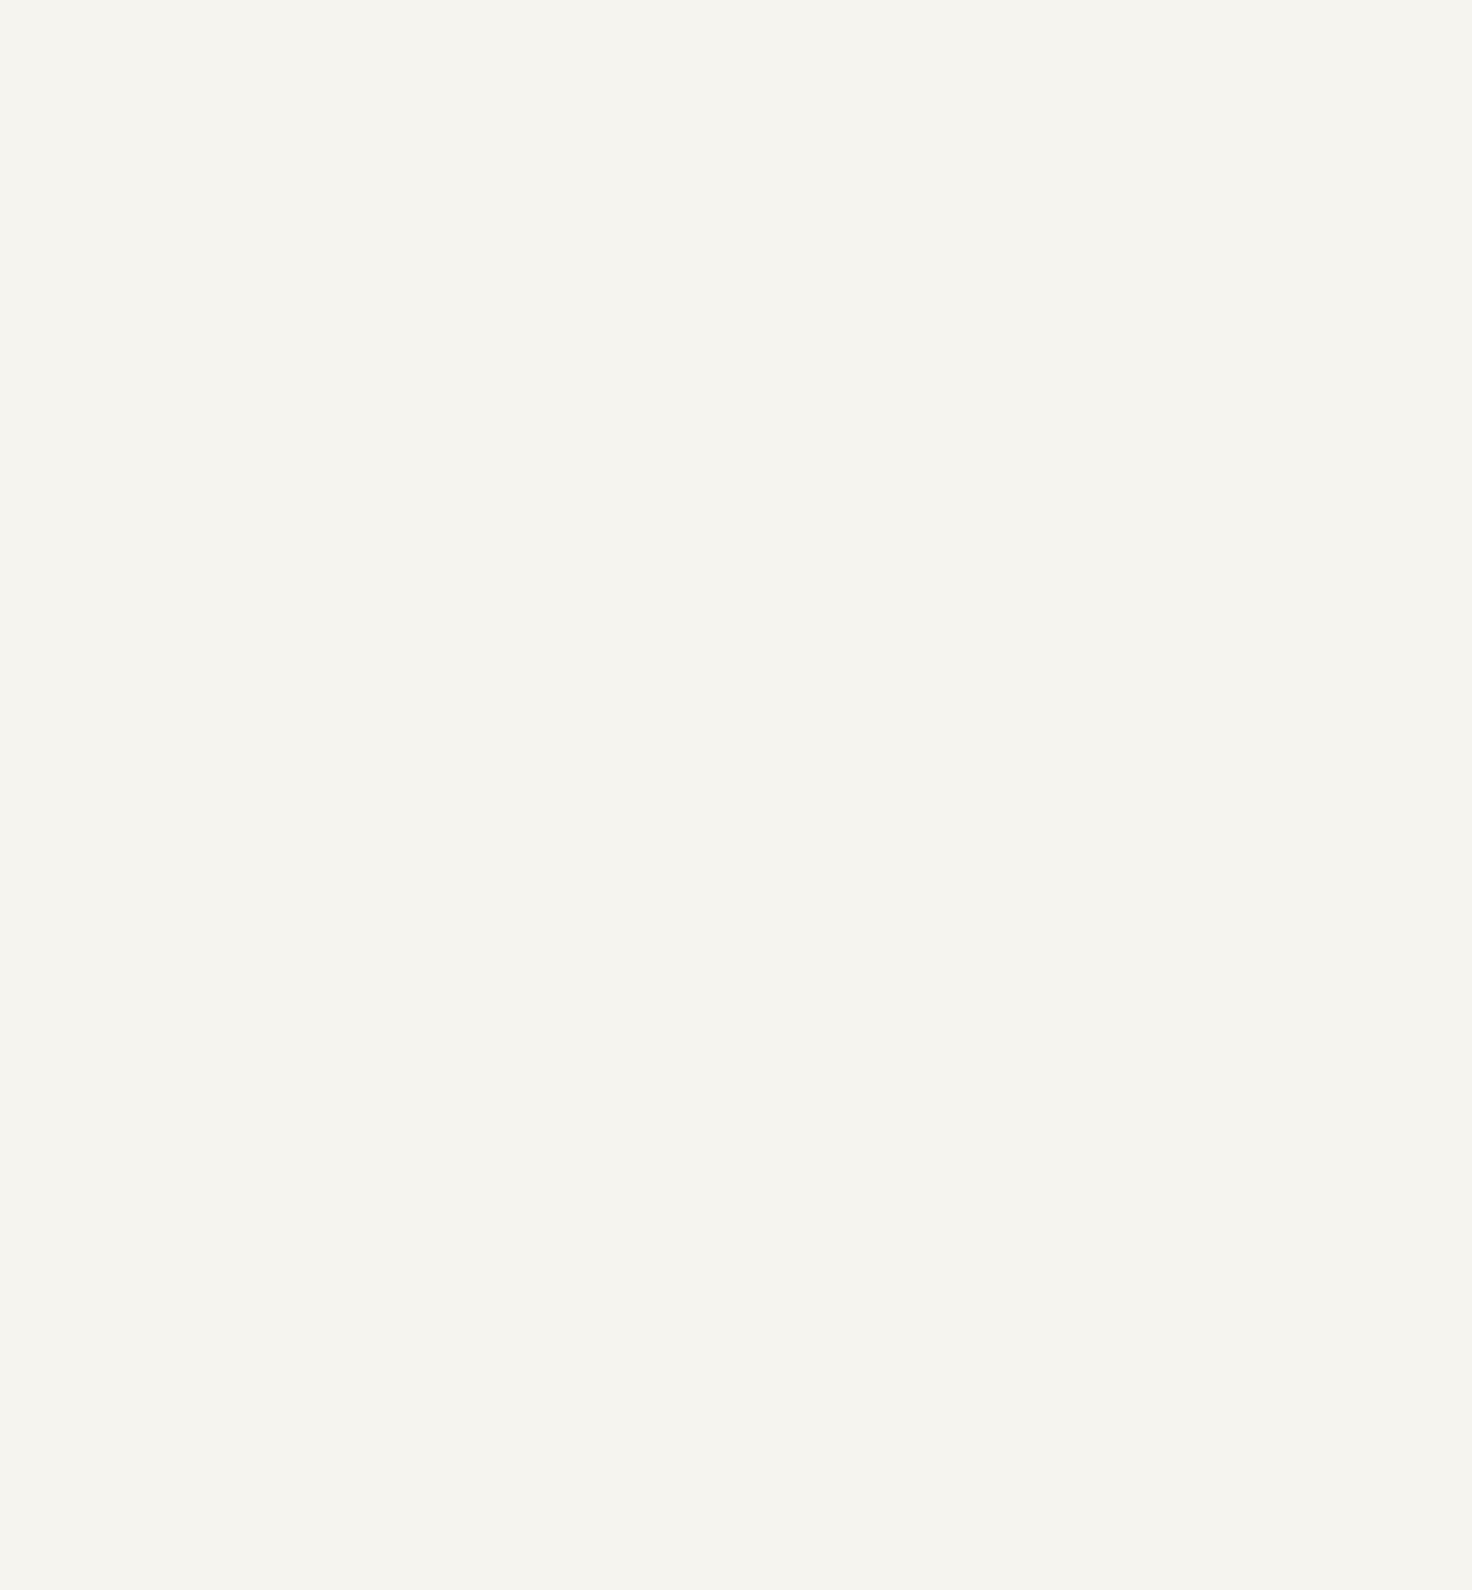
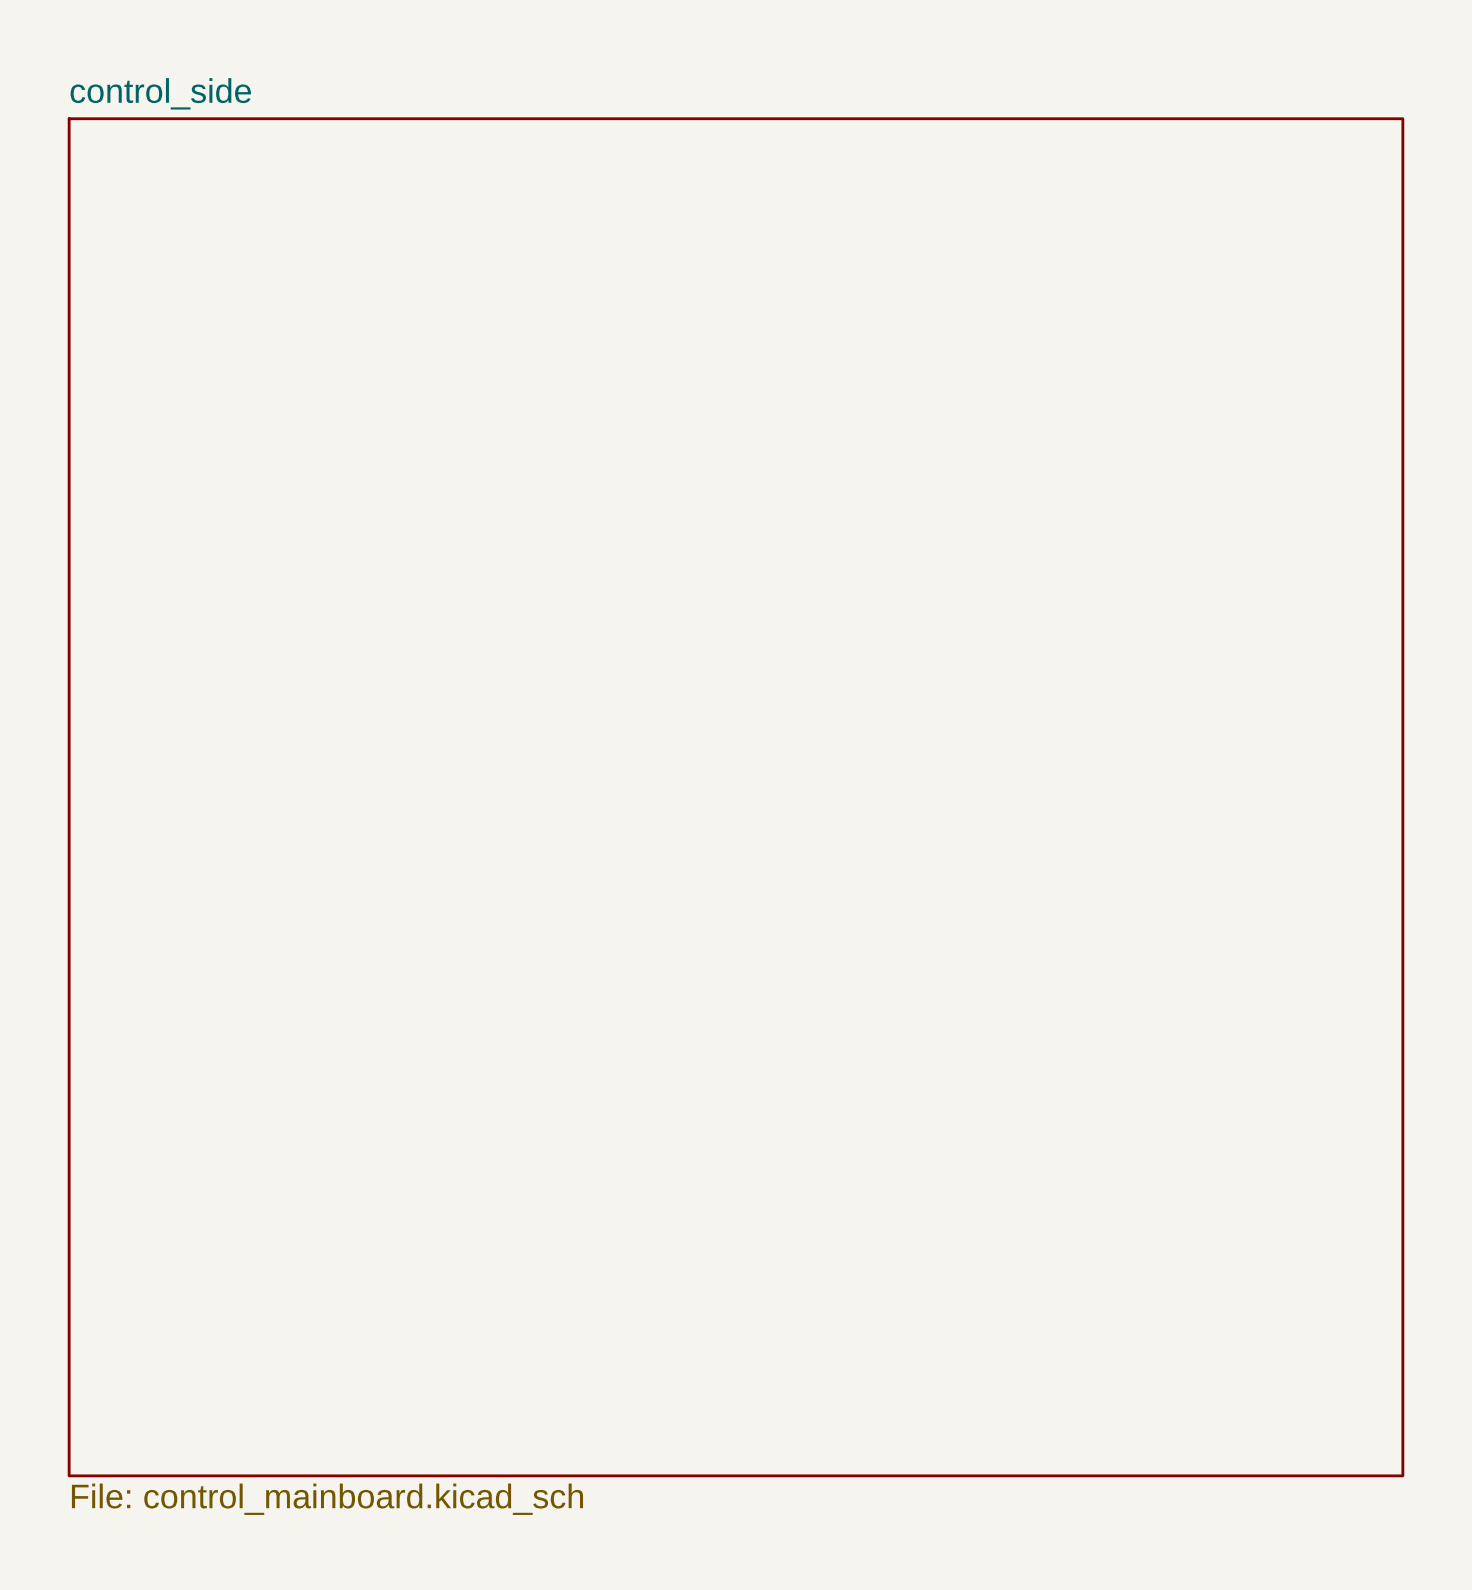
sheet control_side: none -> File: control_mainboard.kicad_sch (735, 797)

